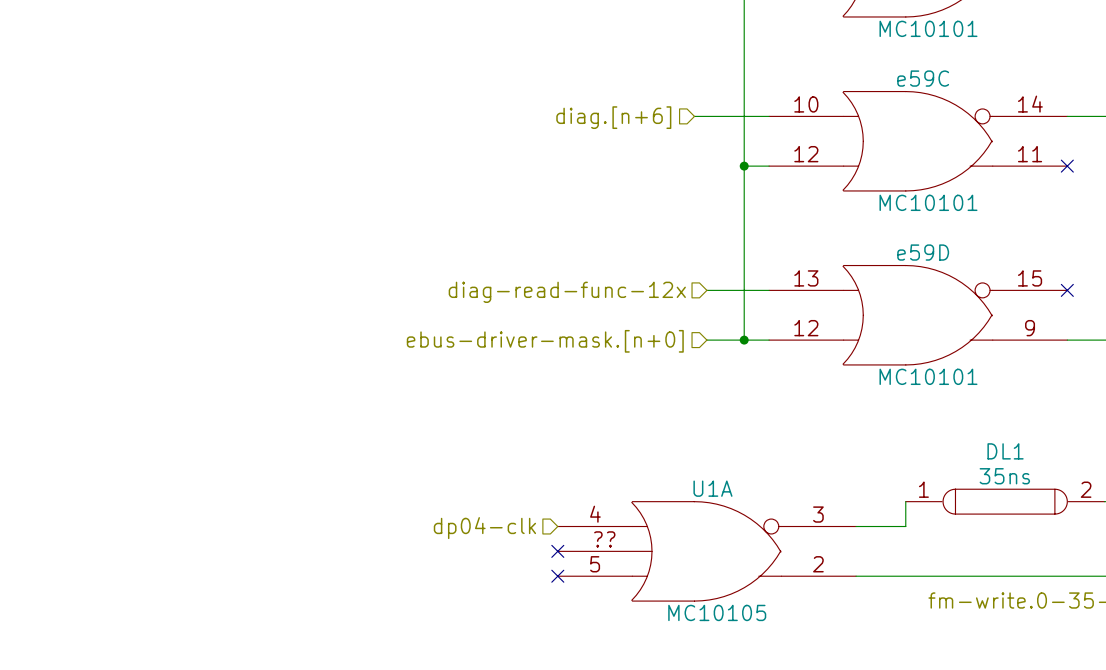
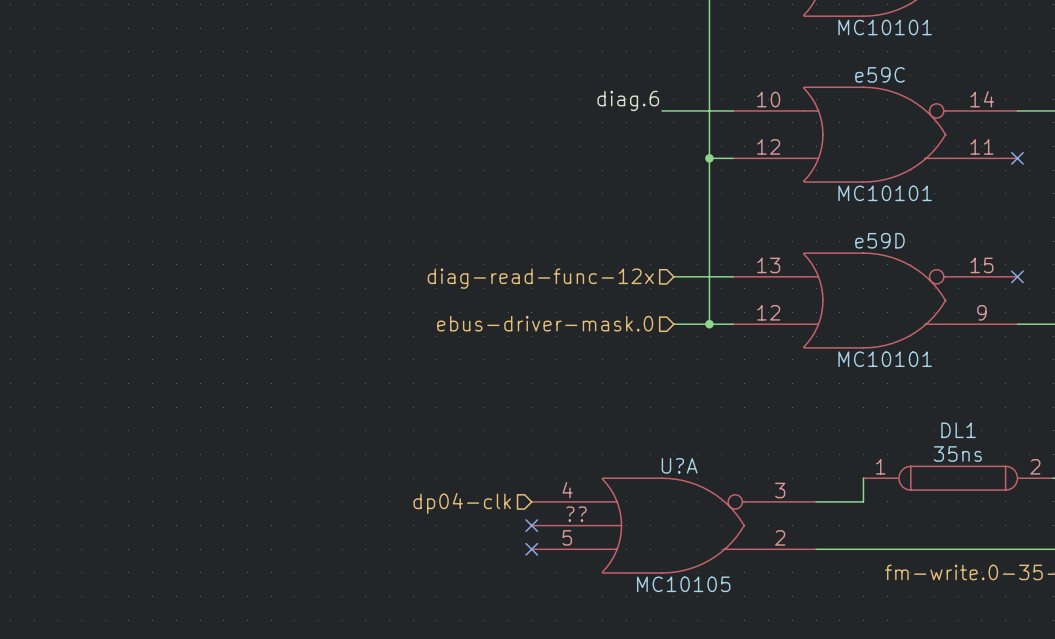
label: none -> diag.6 (628, 100)
hierarchical label: diag.[n+6] (613, 117) -> none
hierarchical label: ebus-driver-mask.[n+0] (545, 341) -> ebus-driver-mask.0 (545, 323)
U1A name: U1A (712, 488) -> U?A (679, 465)

